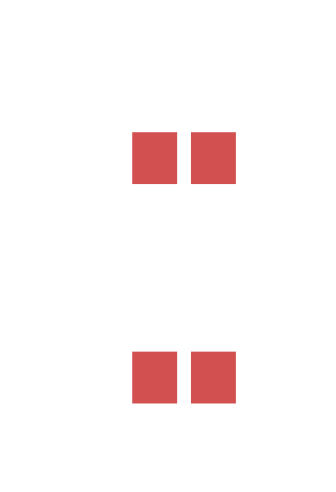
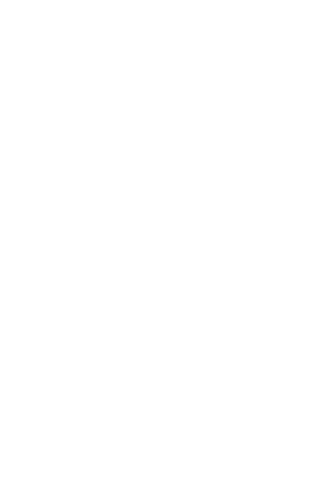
part: (184, 158) -> none
part: (184, 377) -> none

